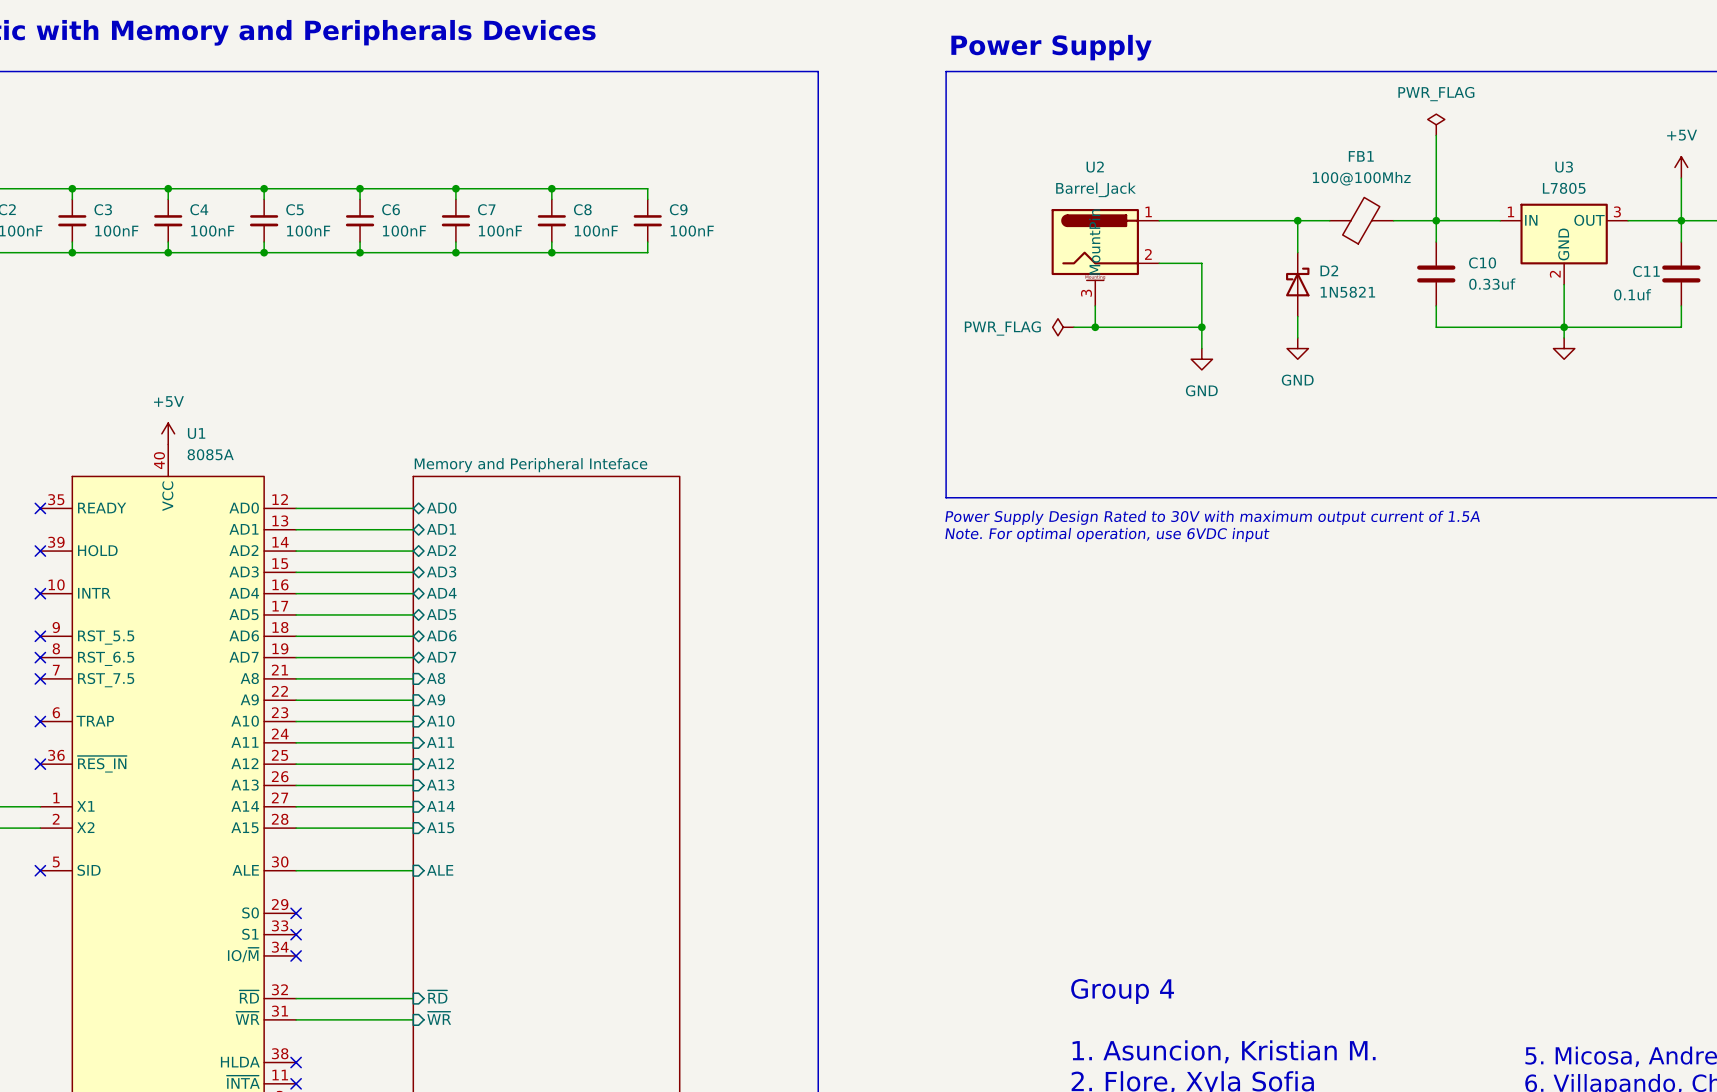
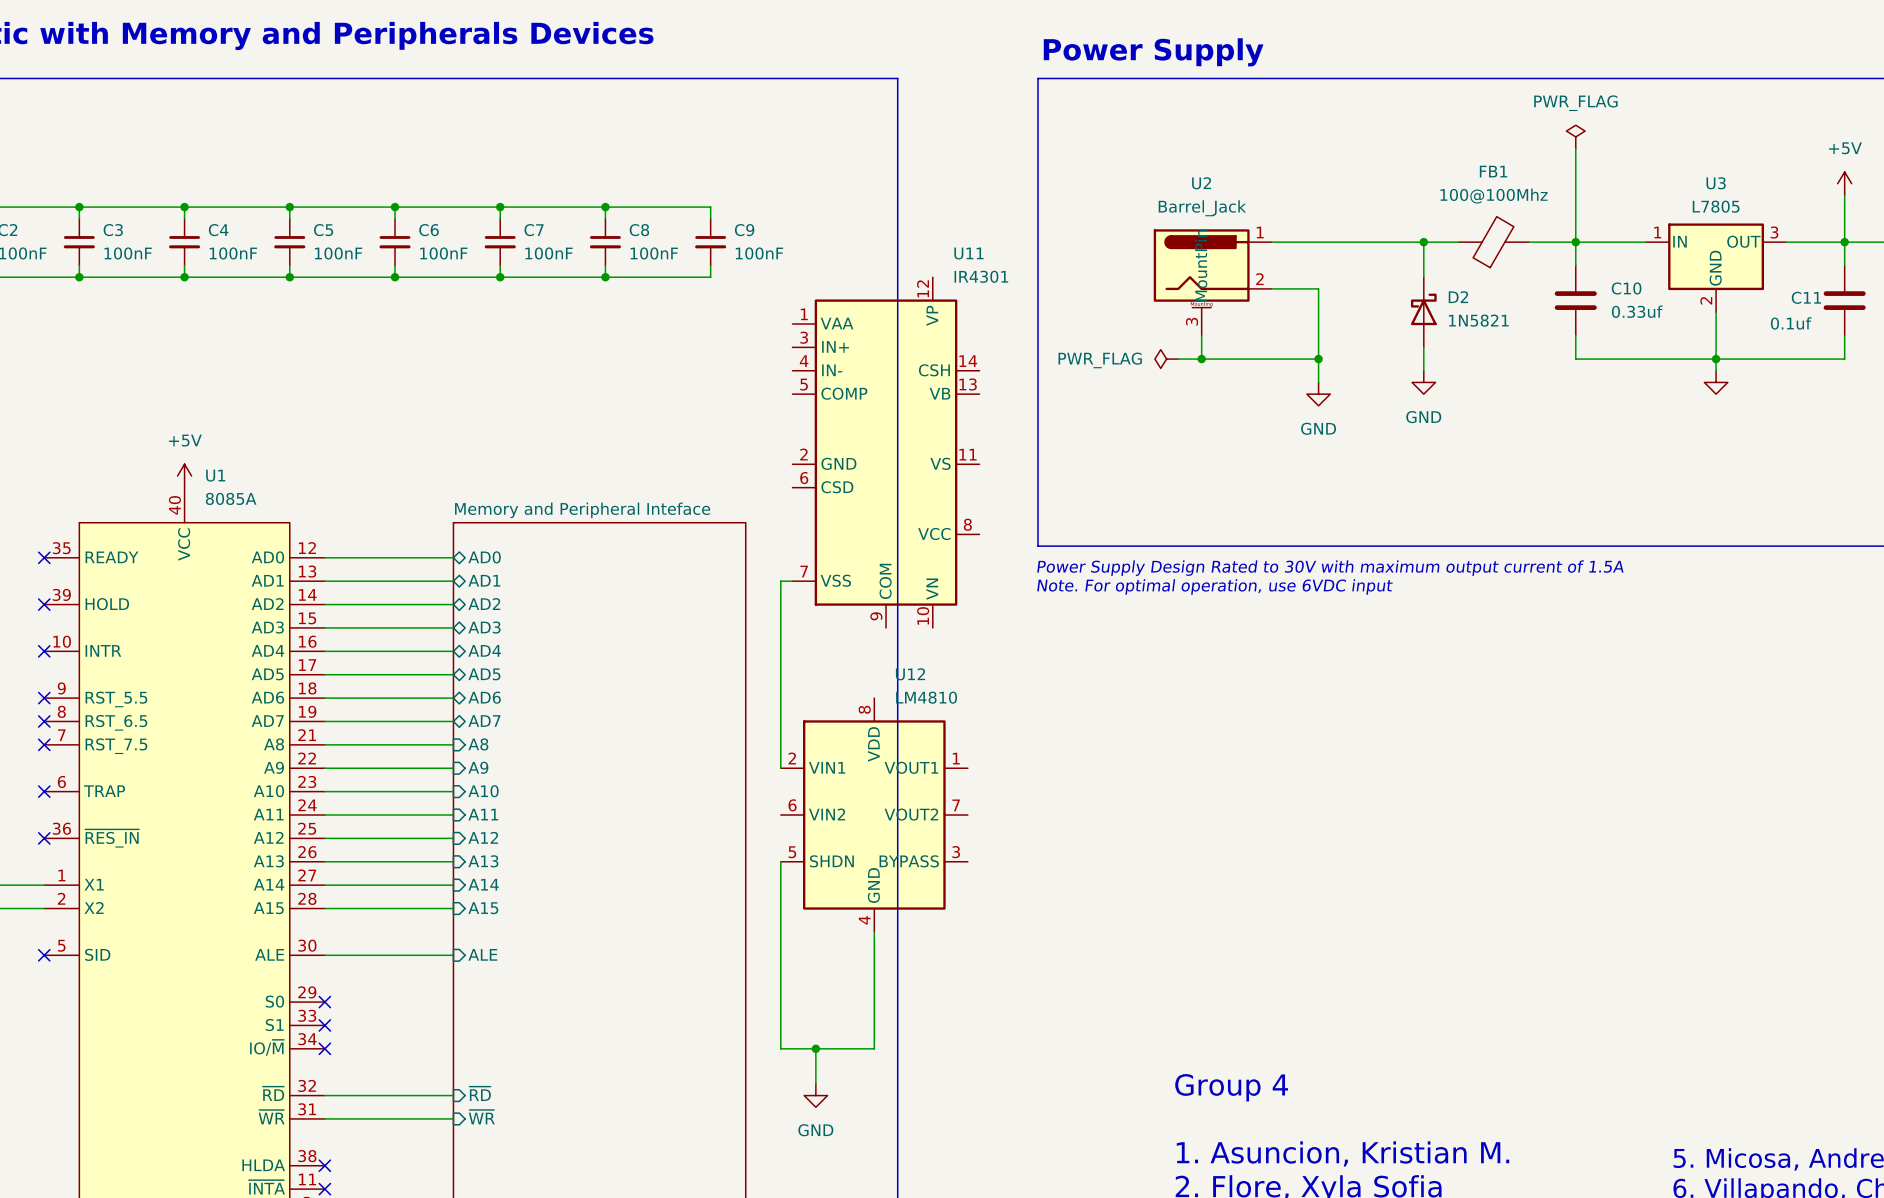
U11: none -> IR4301 (886, 452)
wire: none -> (792, 581) (780, 581) (780, 768)
U12: none -> LM4810 (874, 815)
wire: none -> (780, 861) (780, 1048) (874, 1048) (874, 931)
wire: none -> (815, 1048) (815, 1083)
junction: none -> (815, 1048)
power symbol: none -> GND (815, 1095)

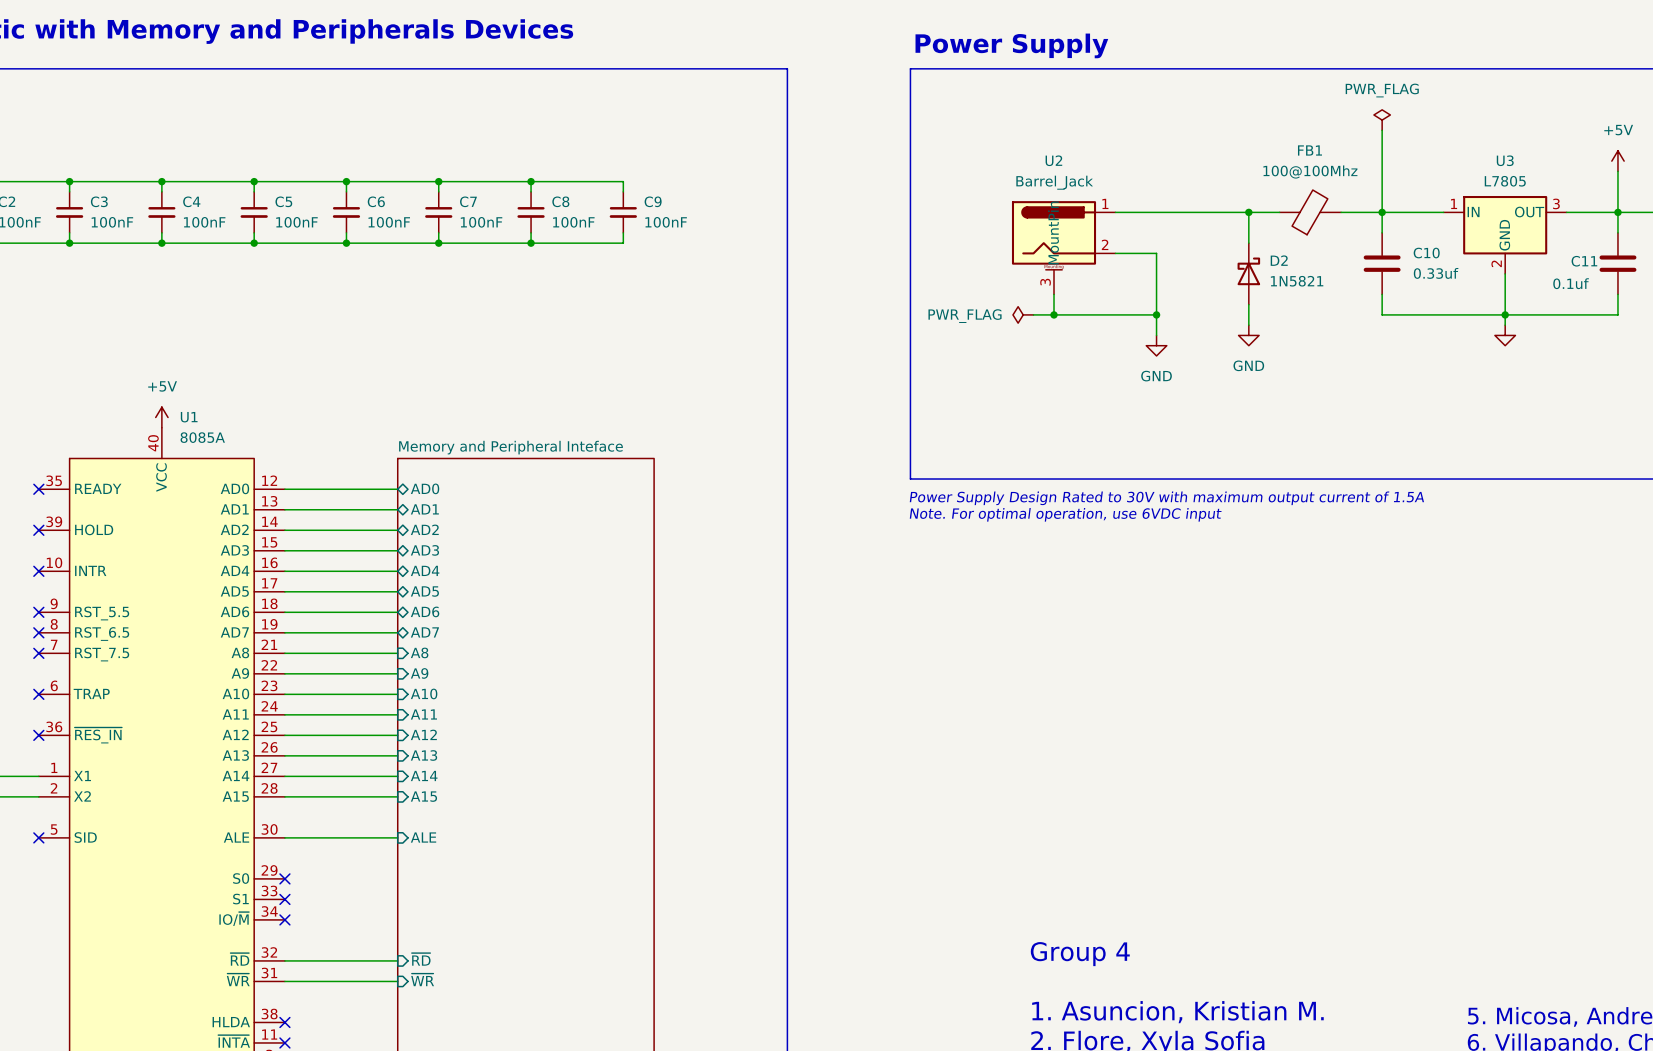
U11: IR4301 (886, 452) -> none
wire: (792, 581) (780, 581) (780, 768) -> none
U12: LM4810 (874, 815) -> none
wire: (780, 861) (780, 1048) (874, 1048) (874, 931) -> none
wire: (815, 1048) (815, 1083) -> none
junction: (815, 1048) -> none
power symbol: GND (815, 1095) -> none

